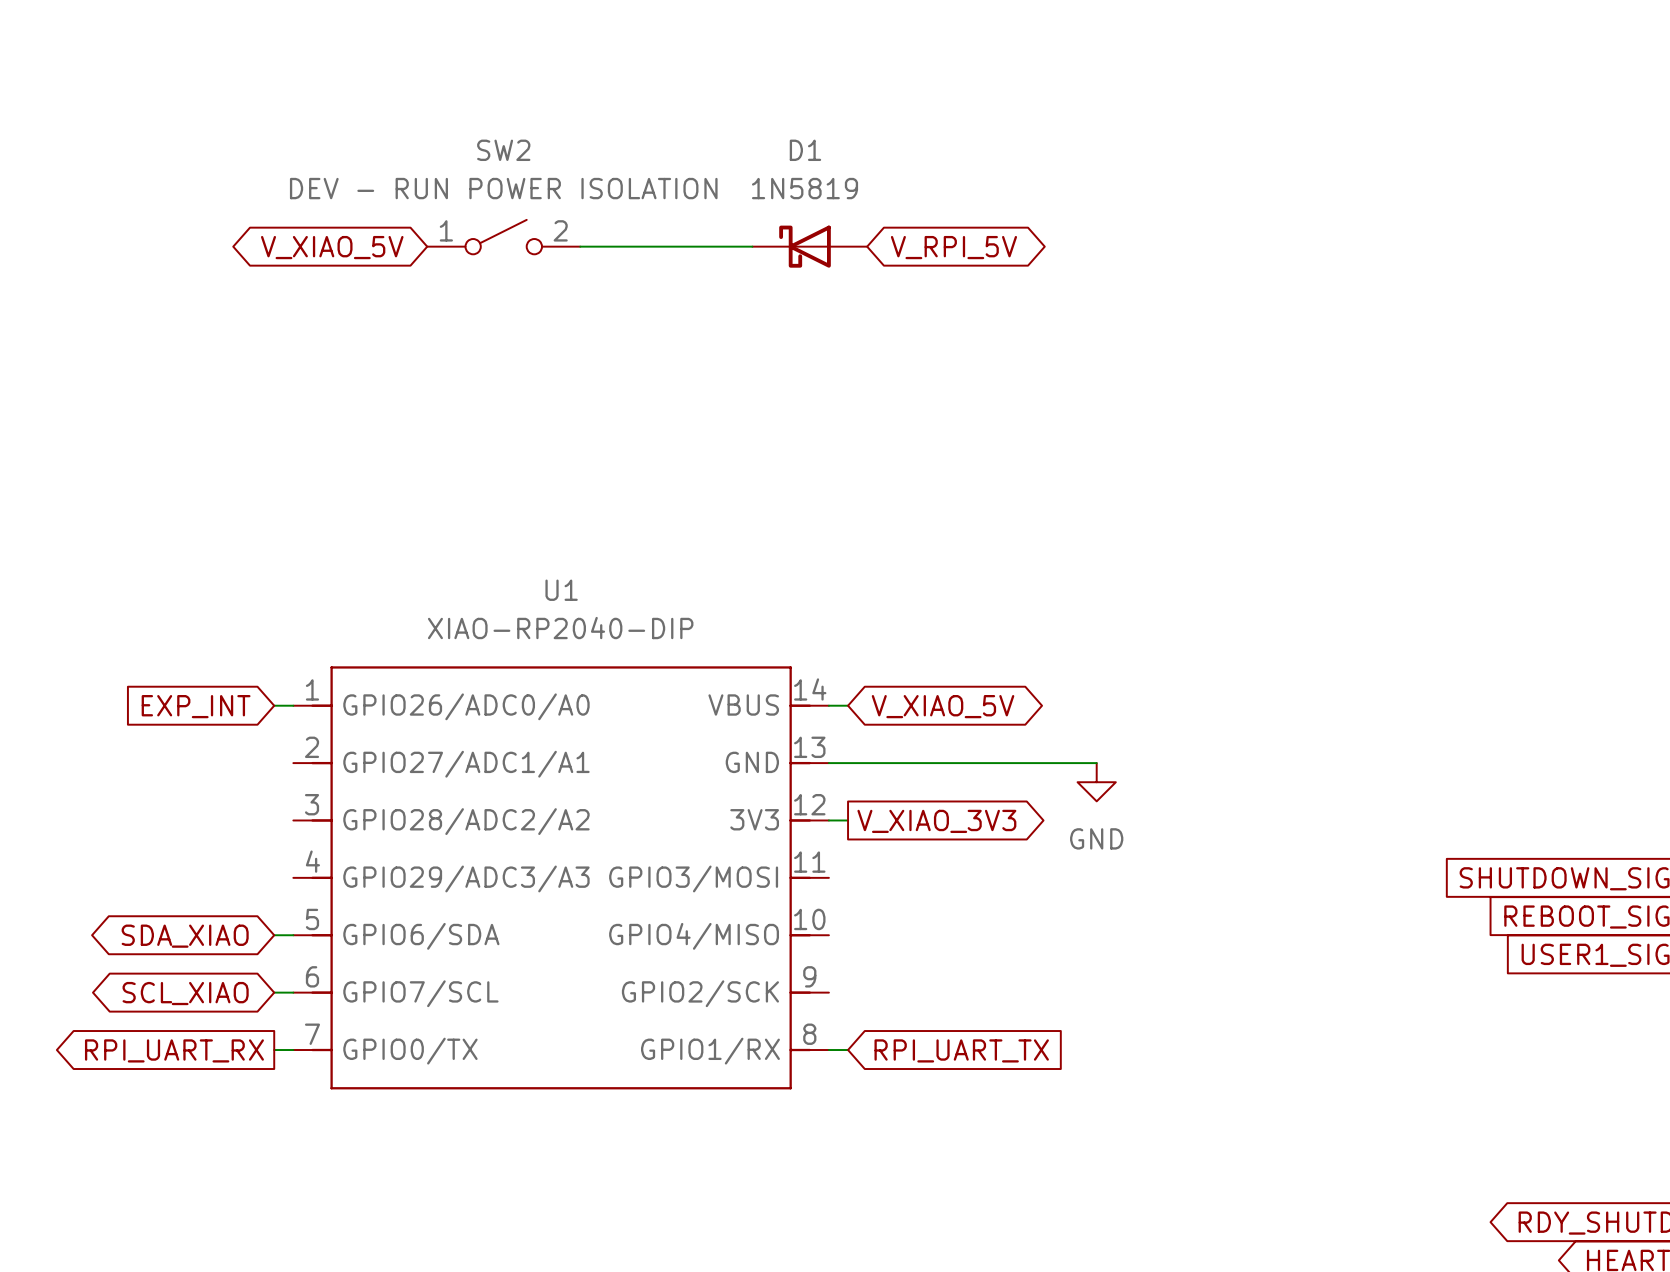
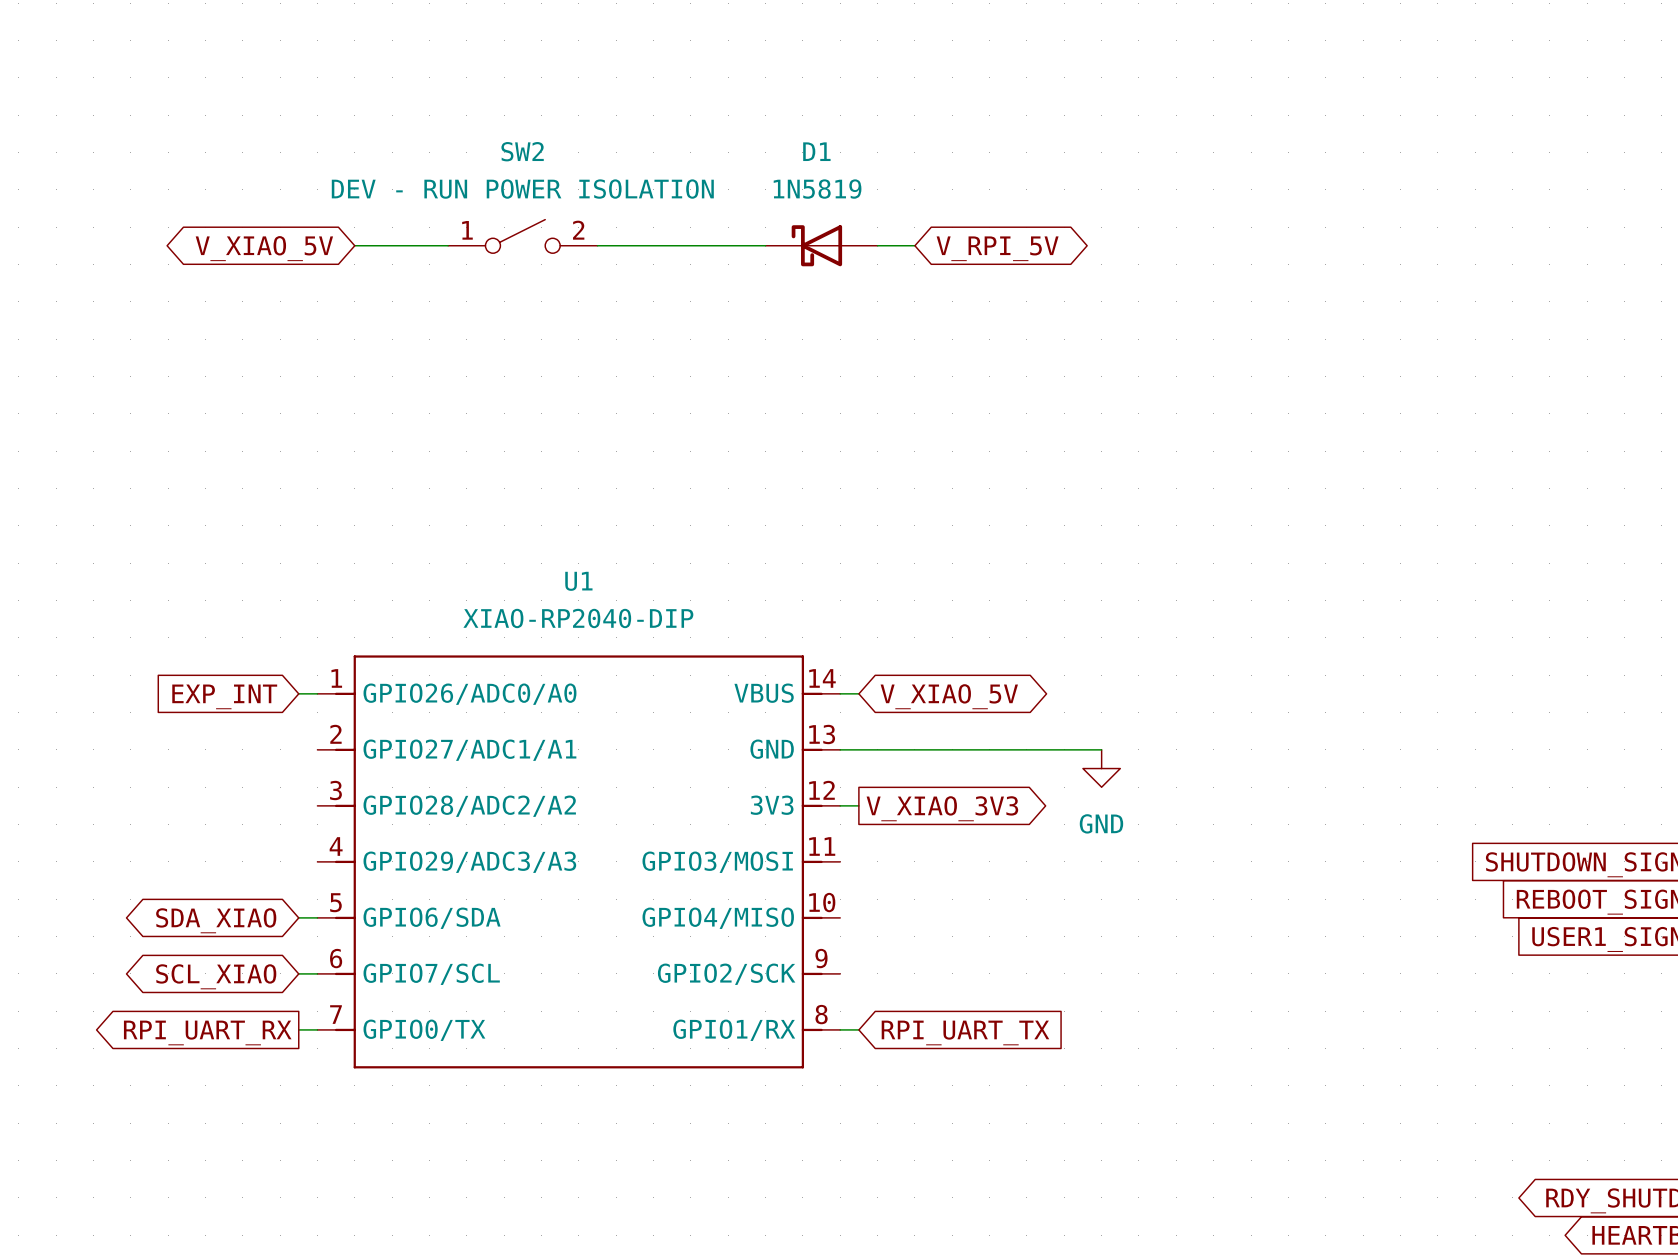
wire: none -> (354, 245) (448, 245)
wire: none -> (877, 245) (914, 245)
global label position: V_XIAO_5V (332, 247) -> V_XIAO_5V (264, 248)
global label position: V_RPI_5V (953, 247) -> V_RPI_5V (997, 248)

